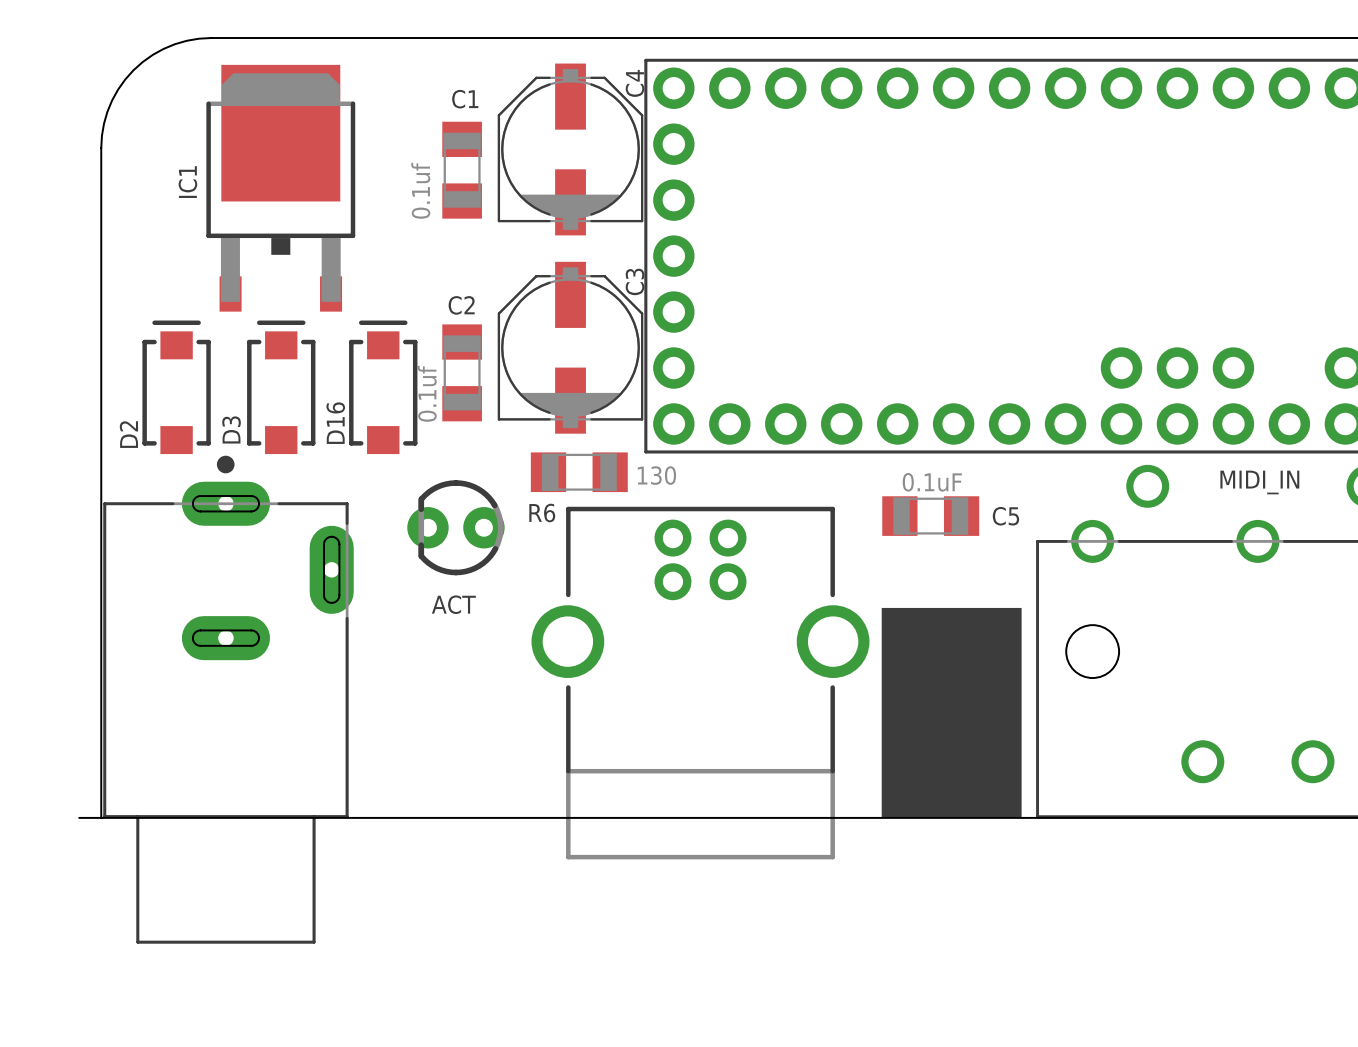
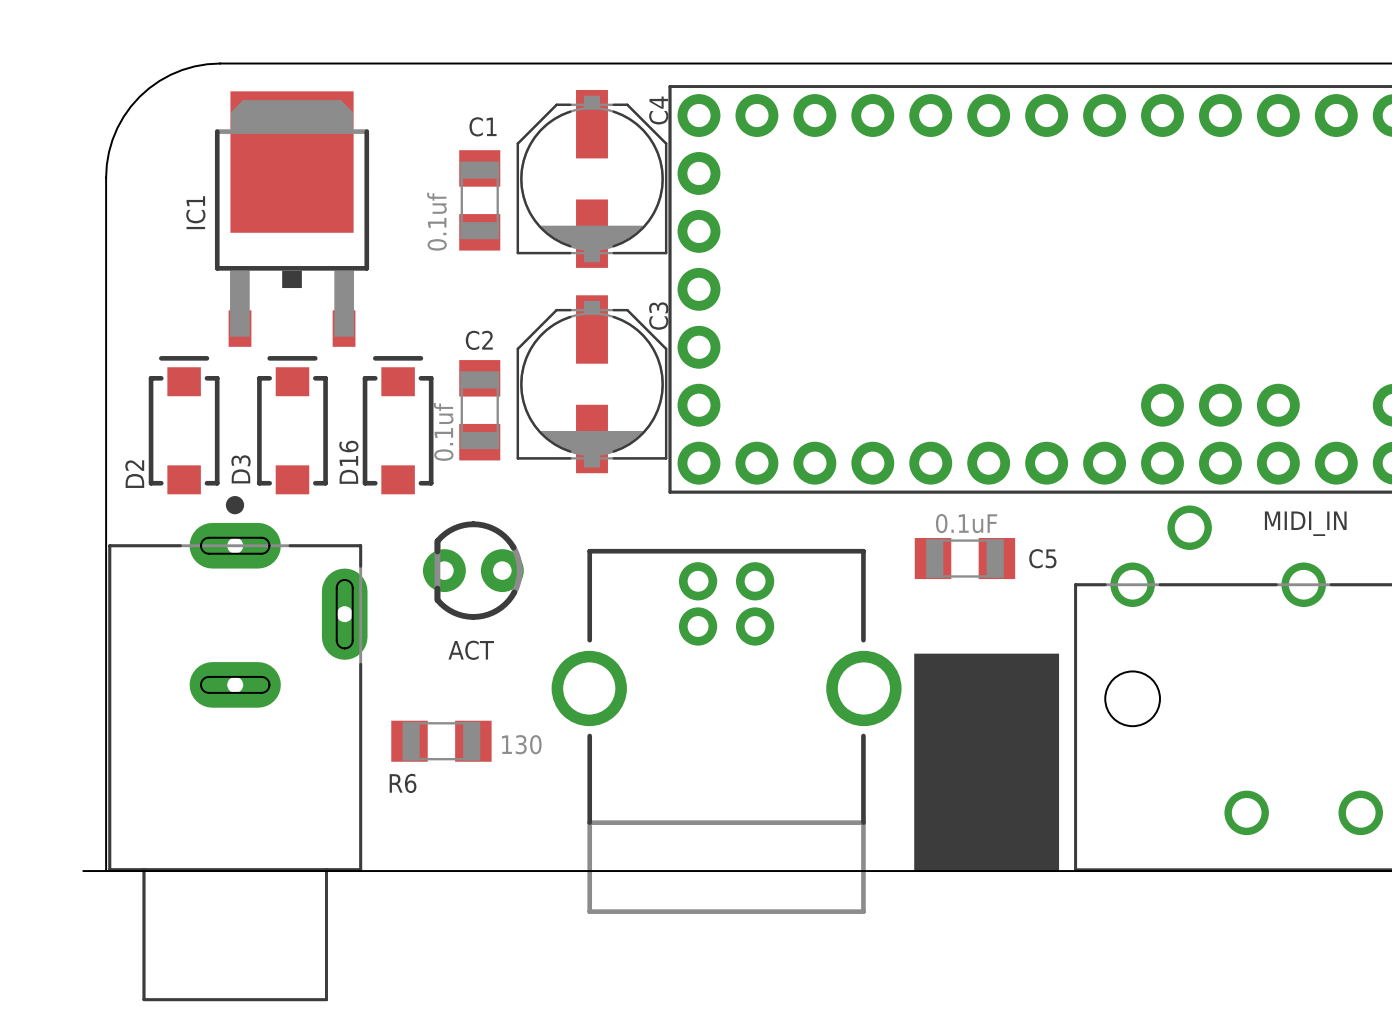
R6 position: (579, 472) -> (441, 741)

